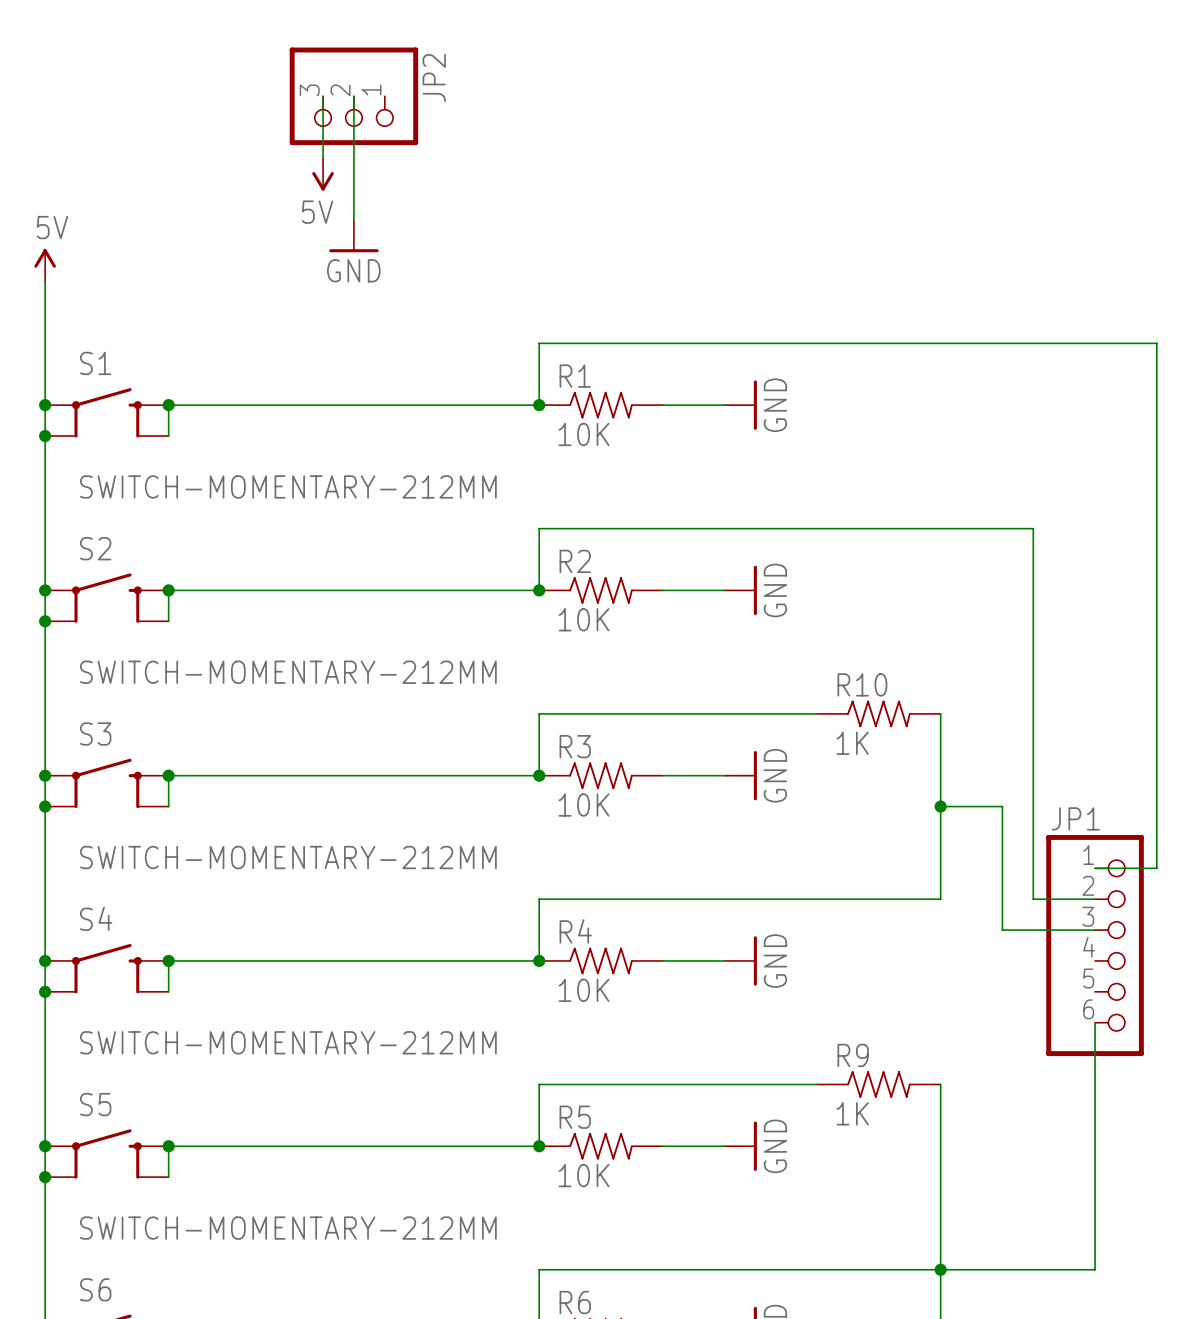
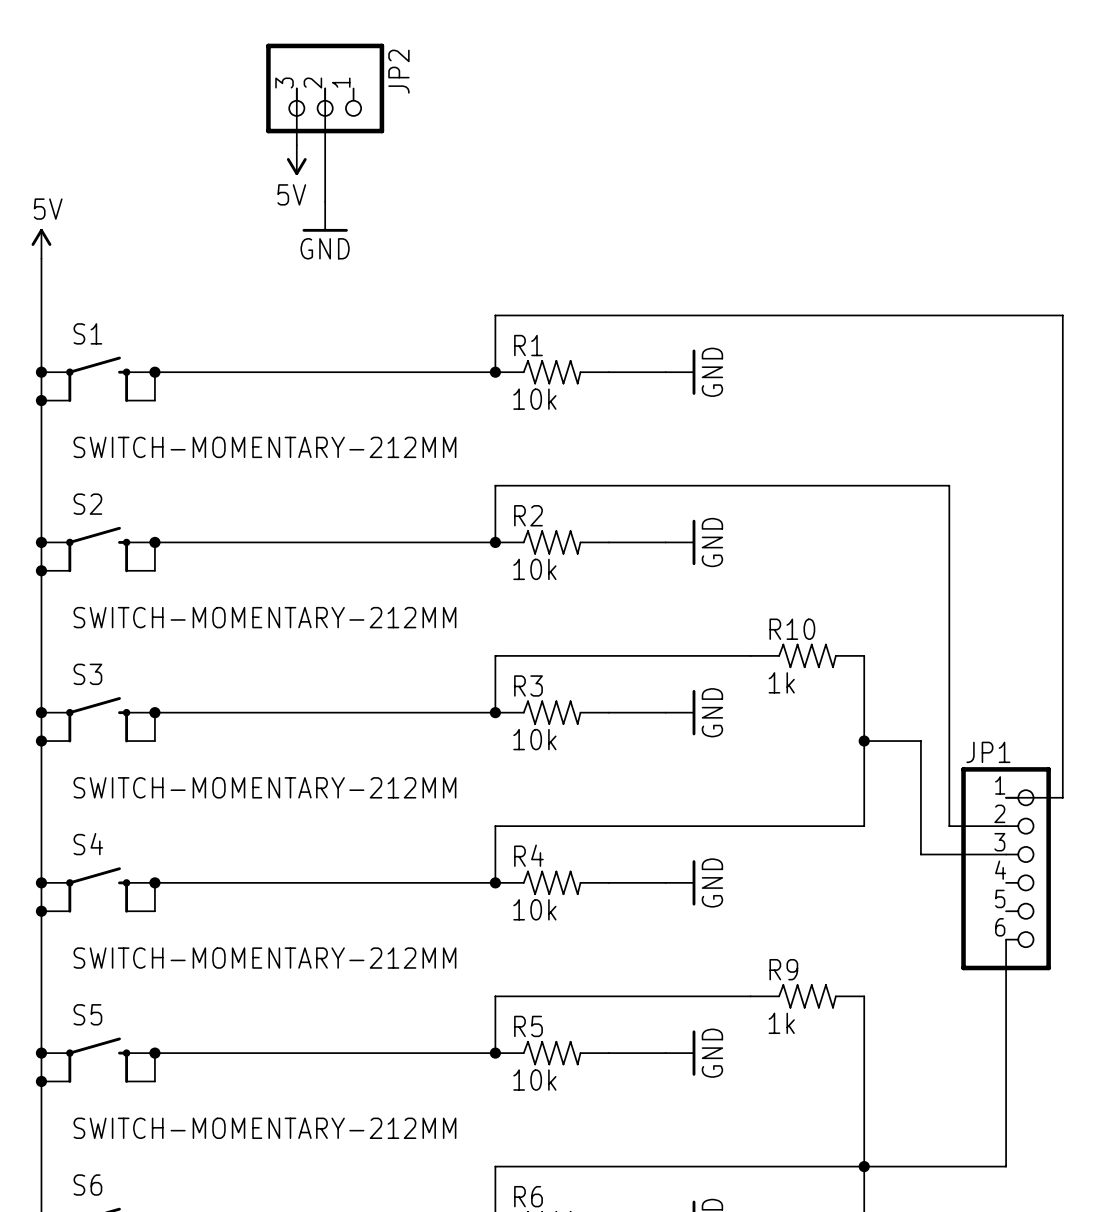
R1 value: 10K (584, 434) -> 10k (534, 399)
R2 value: 10K (584, 619) -> 10k (534, 569)
R10 value: 1K (852, 743) -> 1k (781, 682)
R3 value: 10K (584, 805) -> 10k (534, 739)
R4 value: 10K (584, 990) -> 10k (534, 909)
R9 value: 1K (852, 1113) -> 1k (781, 1023)
R5 value: 10K (584, 1175) -> 10k (534, 1080)

